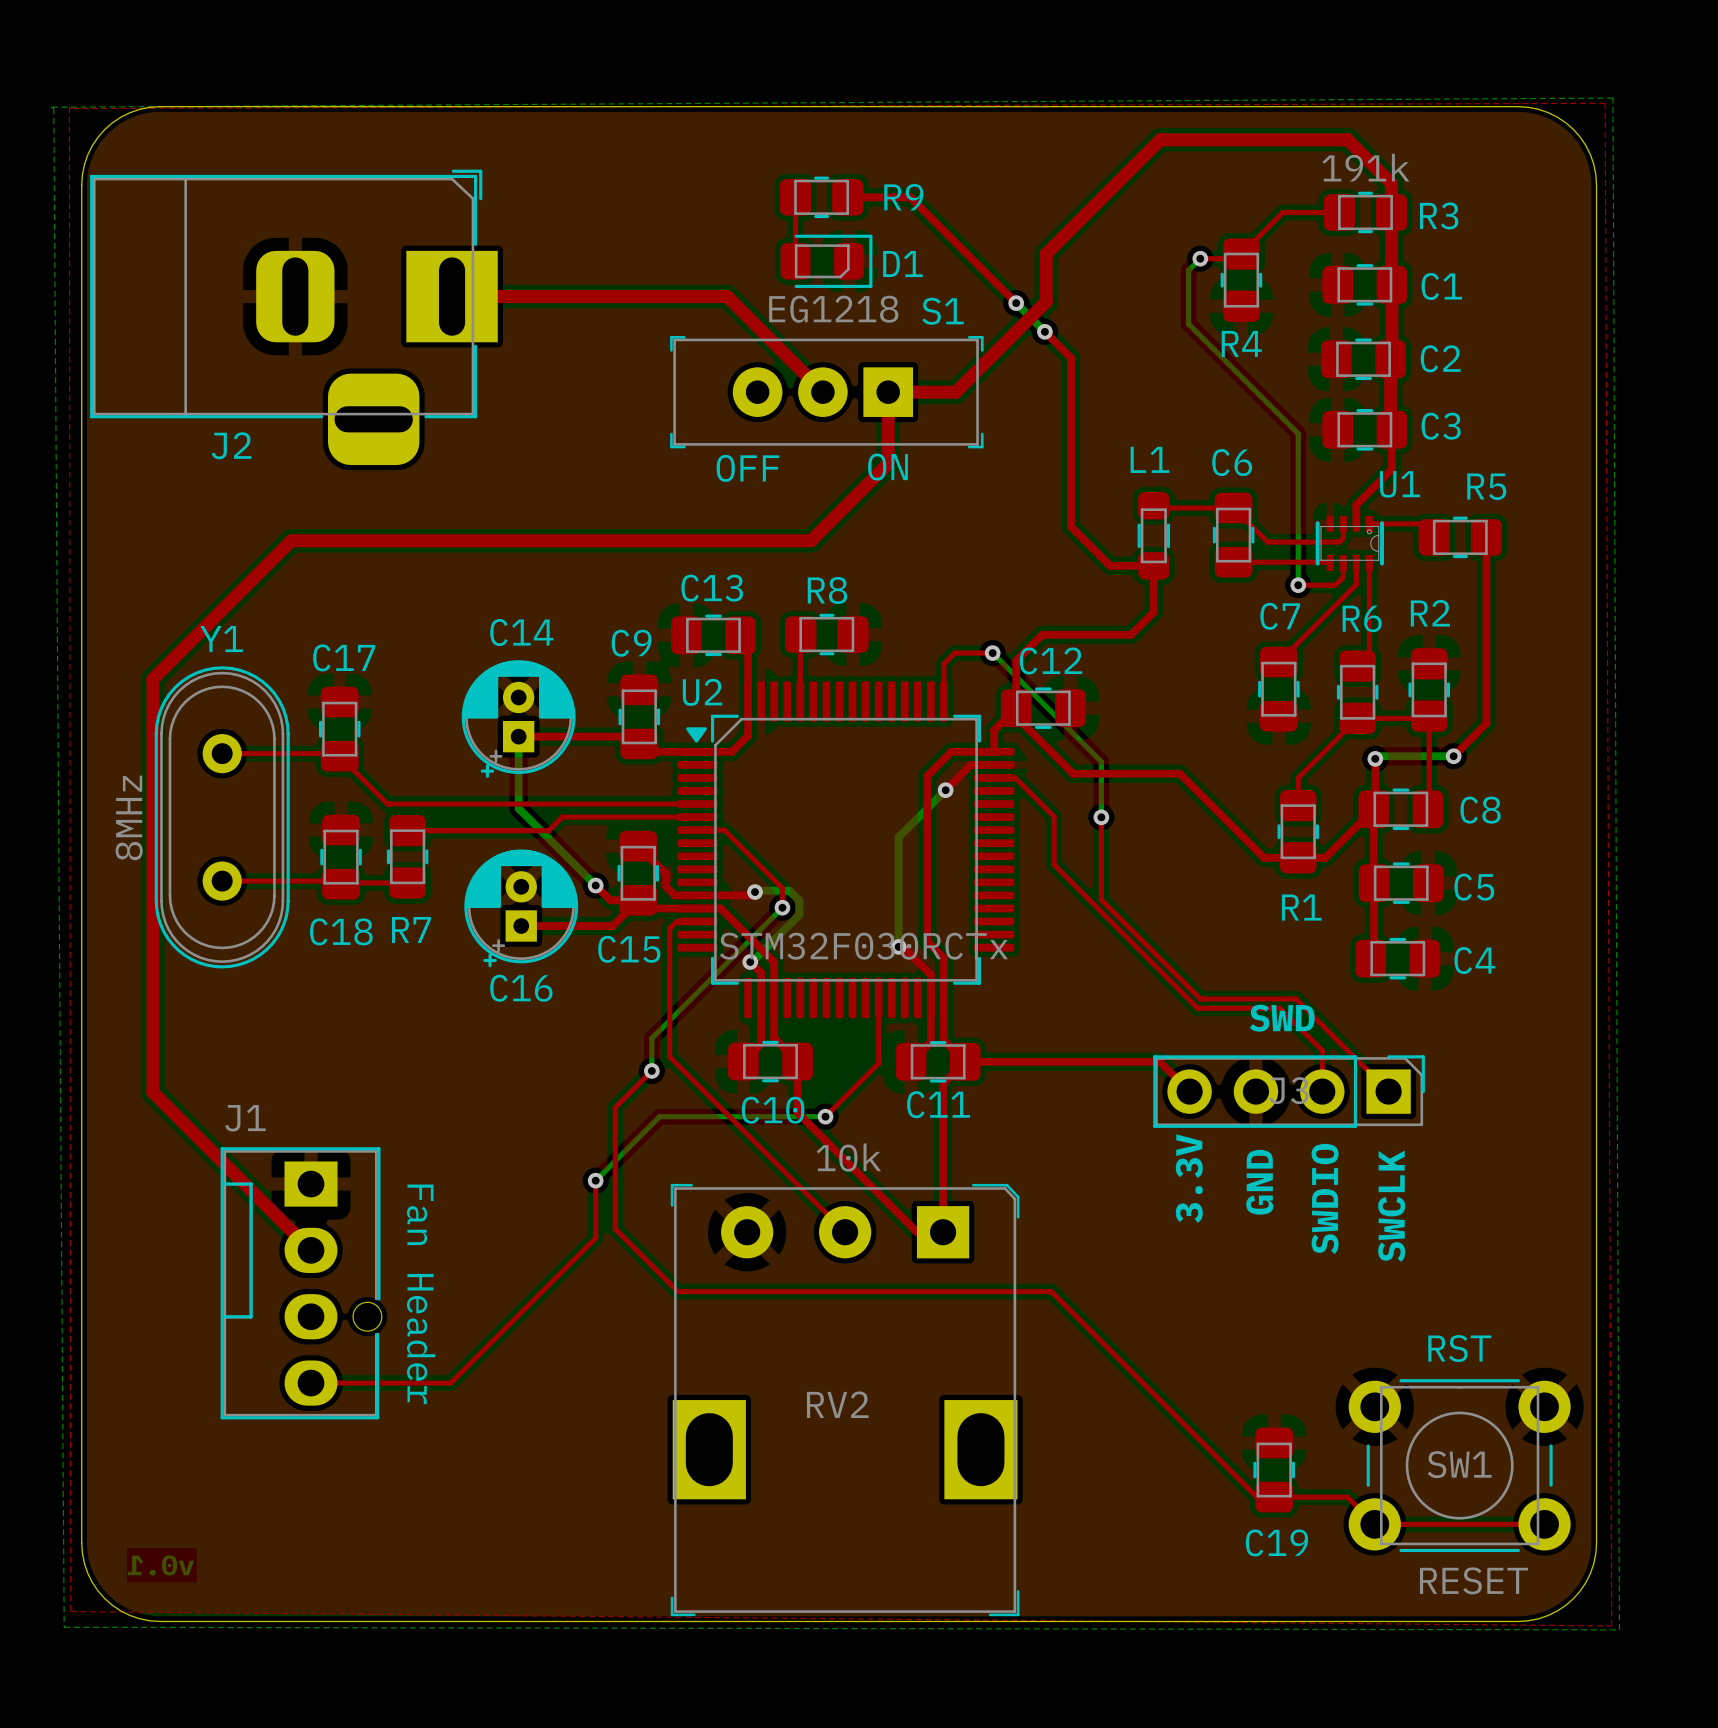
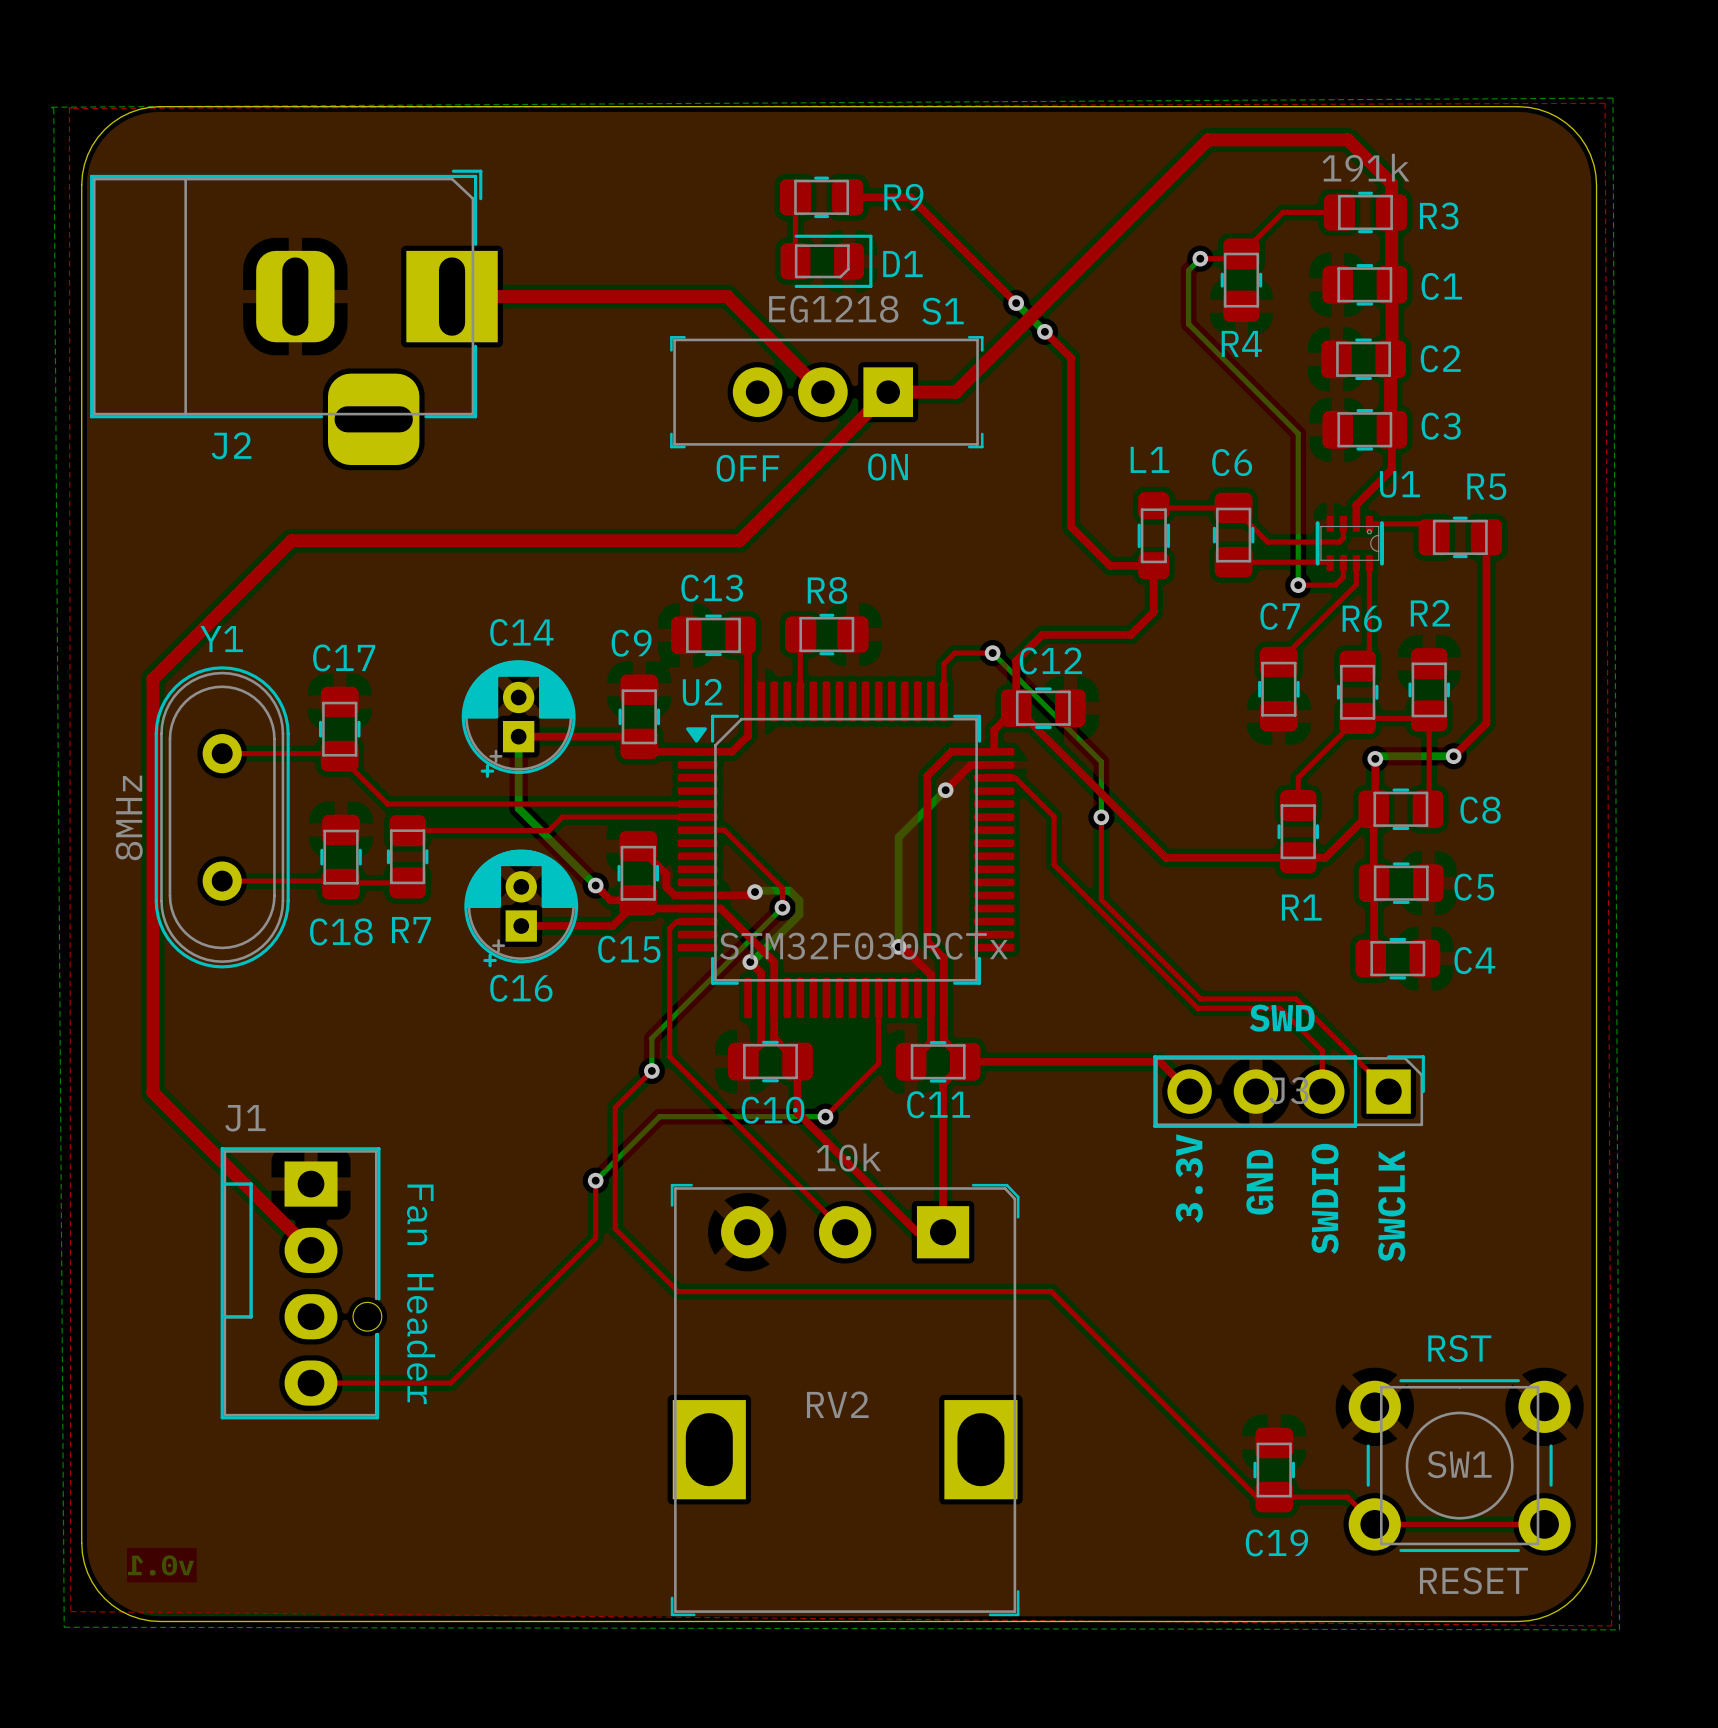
top track: (1208, 139) (1160, 139) (1046, 254) (1046, 301) -> (1208, 139) (1046, 301)
top track: (888, 392) (888, 463) (811, 540) (739, 540) -> (888, 392) (739, 540)
top track: (1016, 708) (1016, 716) (1073, 773) (1179, 773) (1264, 857) -> (1016, 708) (1165, 857) (1264, 857)

